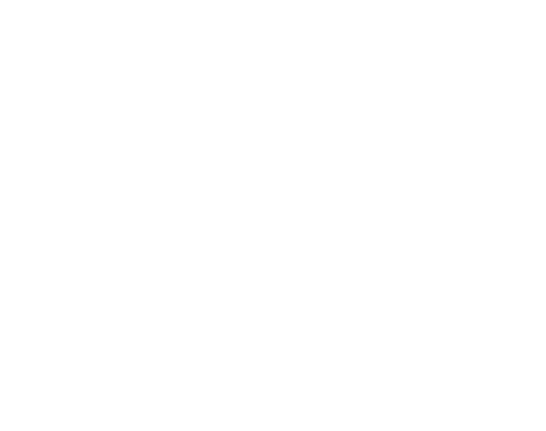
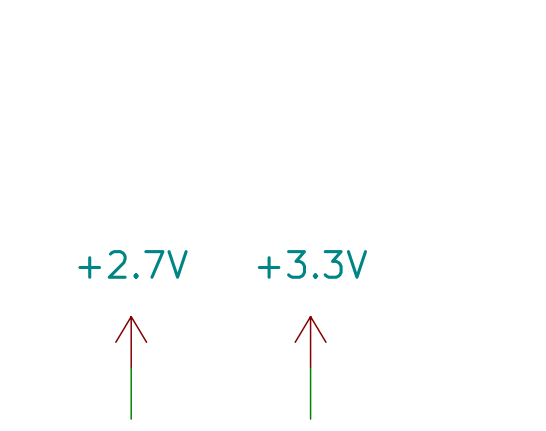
power symbol: none -> +2.7V (131, 342)
power symbol: none -> +3.3V (310, 342)
wire: none -> (131, 367) (131, 419)
wire: none -> (310, 367) (310, 419)

